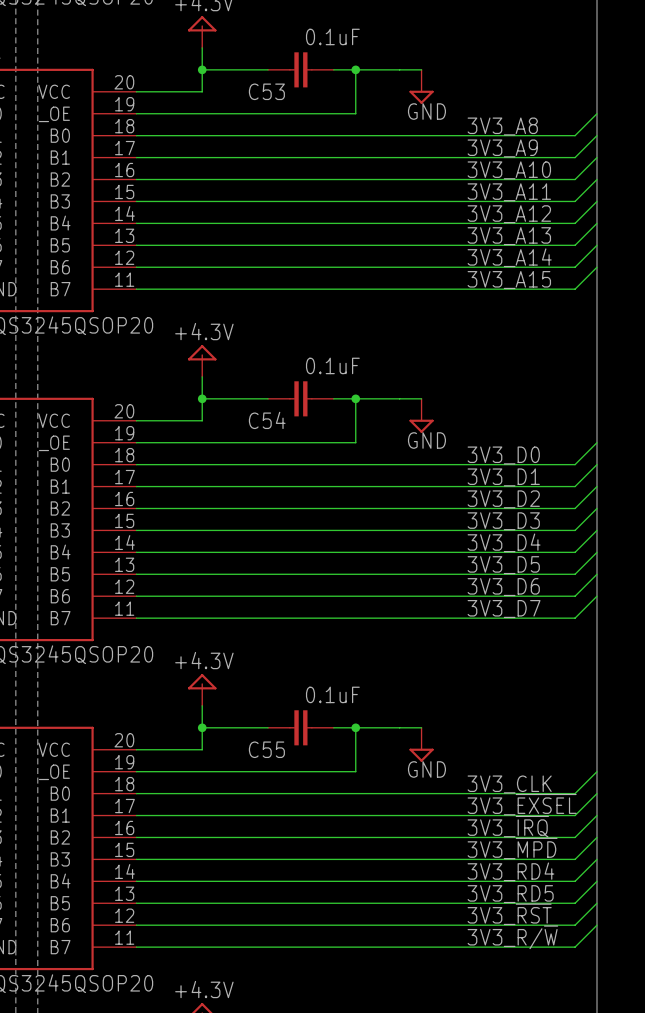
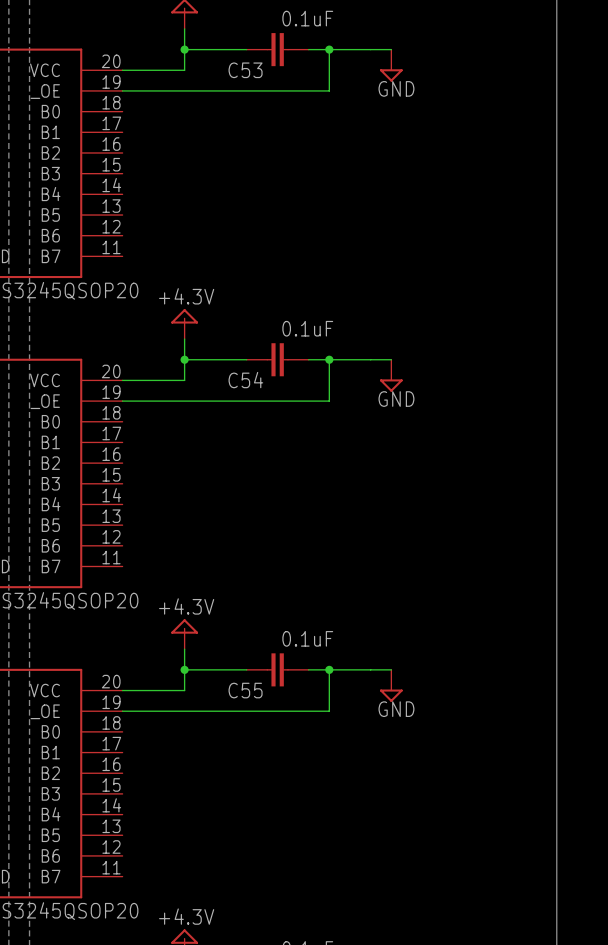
wire: (597, 113) (575, 135) (136, 135) -> none
label: 3V3_A8 (502, 126) -> none
wire: (597, 135) (575, 157) (136, 157) -> none
label: 3V3_A9 (502, 148) -> none
wire: (597, 157) (575, 179) (136, 179) -> none
label: 3V3_A10 (509, 170) -> none
wire: (597, 179) (575, 201) (136, 201) -> none
label: 3V3_A11 (509, 192) -> none
wire: (597, 201) (575, 223) (136, 223) -> none
label: 3V3_A12 (509, 214) -> none
wire: (597, 223) (575, 245) (136, 245) -> none
label: 3V3_A13 (509, 236) -> none
wire: (597, 245) (575, 267) (136, 267) -> none
label: 3V3_A14 (509, 257) -> none
wire: (597, 267) (575, 289) (136, 289) -> none
label: 3V3_A15 (509, 280) -> none
wire: (597, 442) (575, 464) (136, 464) -> none
label: 3V3_D0 (503, 455) -> none
wire: (597, 464) (575, 486) (136, 486) -> none
label: 3V3_D1 (503, 477) -> none
wire: (597, 486) (575, 508) (136, 508) -> none
label: 3V3_D2 (503, 499) -> none
wire: (597, 508) (575, 530) (136, 530) -> none
label: 3V3_D3 (503, 521) -> none
wire: (597, 530) (575, 552) (136, 552) -> none
label: 3V3_D4 (504, 542) -> none
wire: (597, 552) (575, 574) (136, 574) -> none
label: 3V3_D5 (503, 565) -> none
wire: (597, 574) (575, 596) (136, 596) -> none
label: 3V3_D6 (503, 587) -> none
wire: (597, 596) (575, 618) (136, 618) -> none
label: 3V3_D7 (504, 609) -> none
wire: (597, 771) (575, 793) (136, 793) -> none
label: 3V3_CLK (509, 784) -> none
wire: (597, 793) (575, 815) (136, 815) -> none
label: 3V3_~{EXSEL} (522, 804) -> none
wire: (597, 815) (575, 837) (136, 837) -> none
label: 3V3_~{IRQ} (508, 826) -> none
wire: (597, 837) (575, 859) (136, 859) -> none
label: 3V3_~{MPD} (512, 848) -> none
wire: (597, 859) (575, 881) (136, 881) -> none
label: 3V3_RD4 (510, 871) -> none
wire: (597, 881) (575, 903) (136, 903) -> none
label: 3V3_RD5 (510, 894) -> none
wire: (597, 903) (575, 925) (136, 925) -> none
label: 3V3_~{RST} (509, 914) -> none
wire: (597, 925) (575, 947) (136, 947) -> none
label: 3V3_R/~{W} (512, 937) -> none

